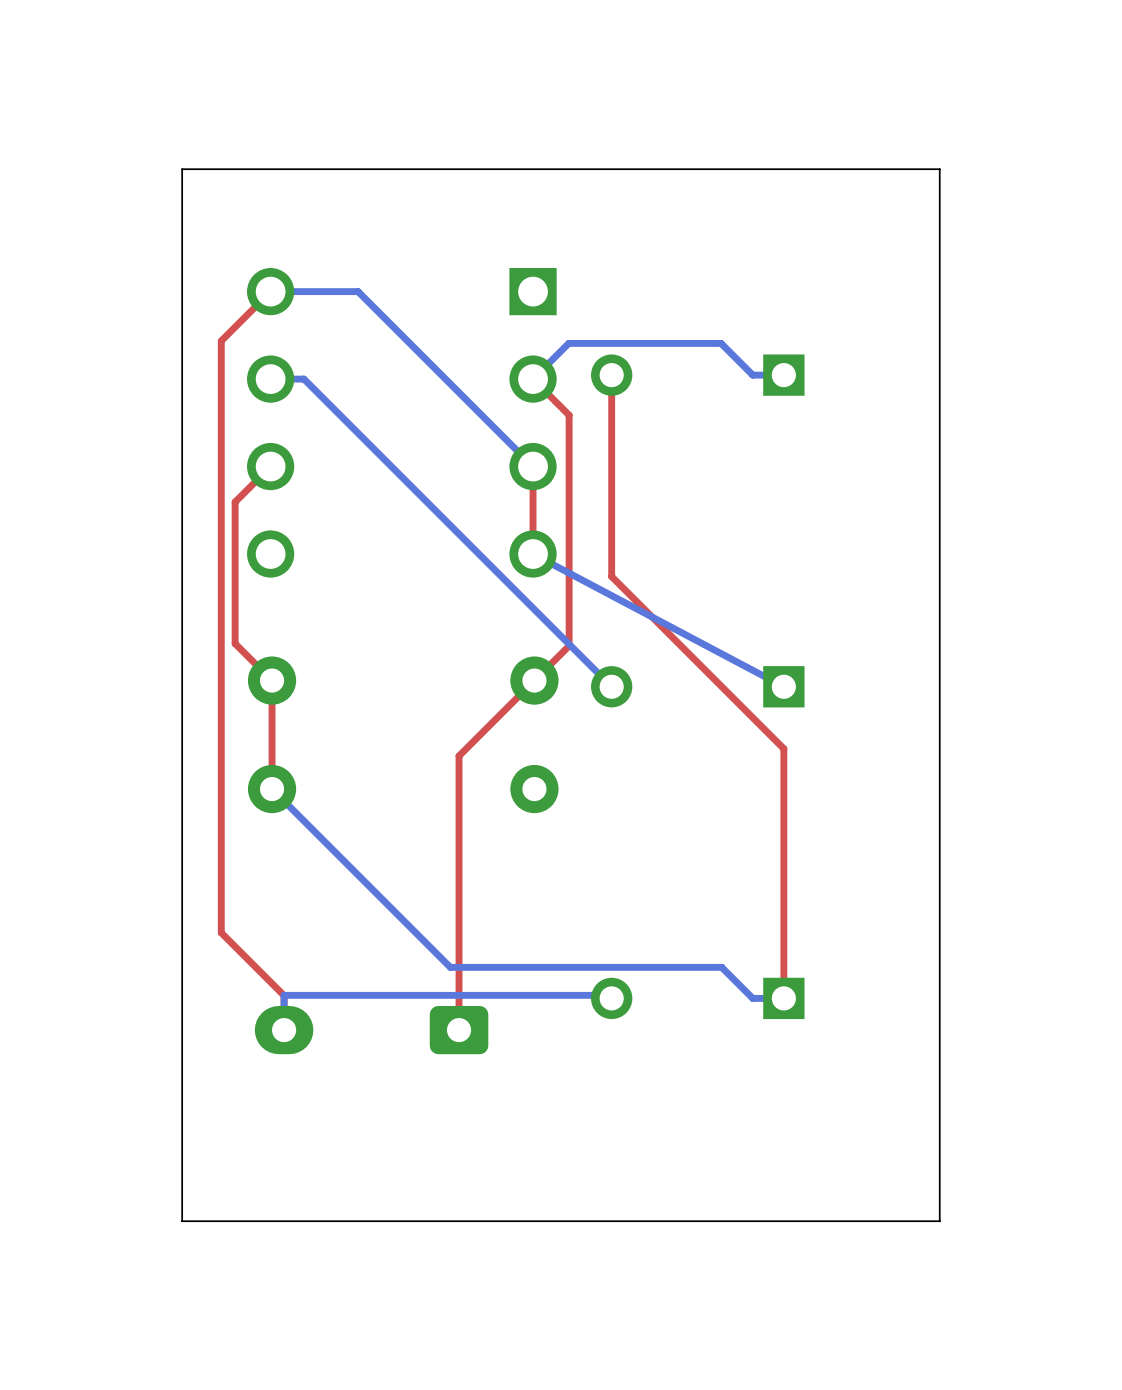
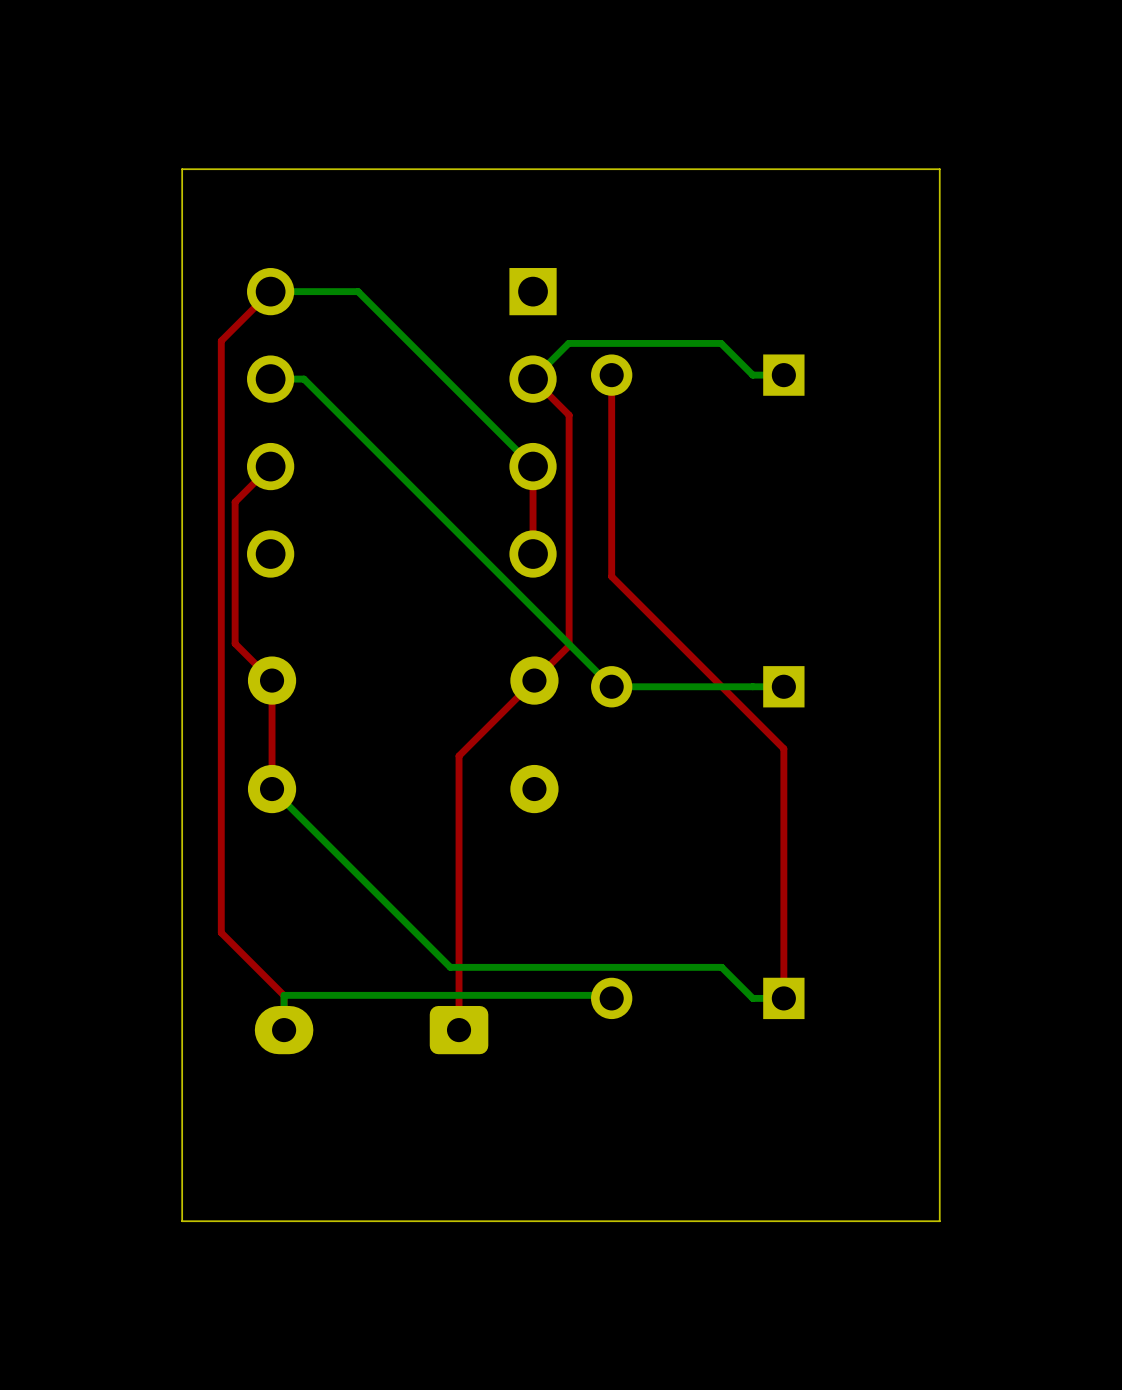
bottom track: (533, 554) (783, 686) -> (611, 686) (783, 686)

